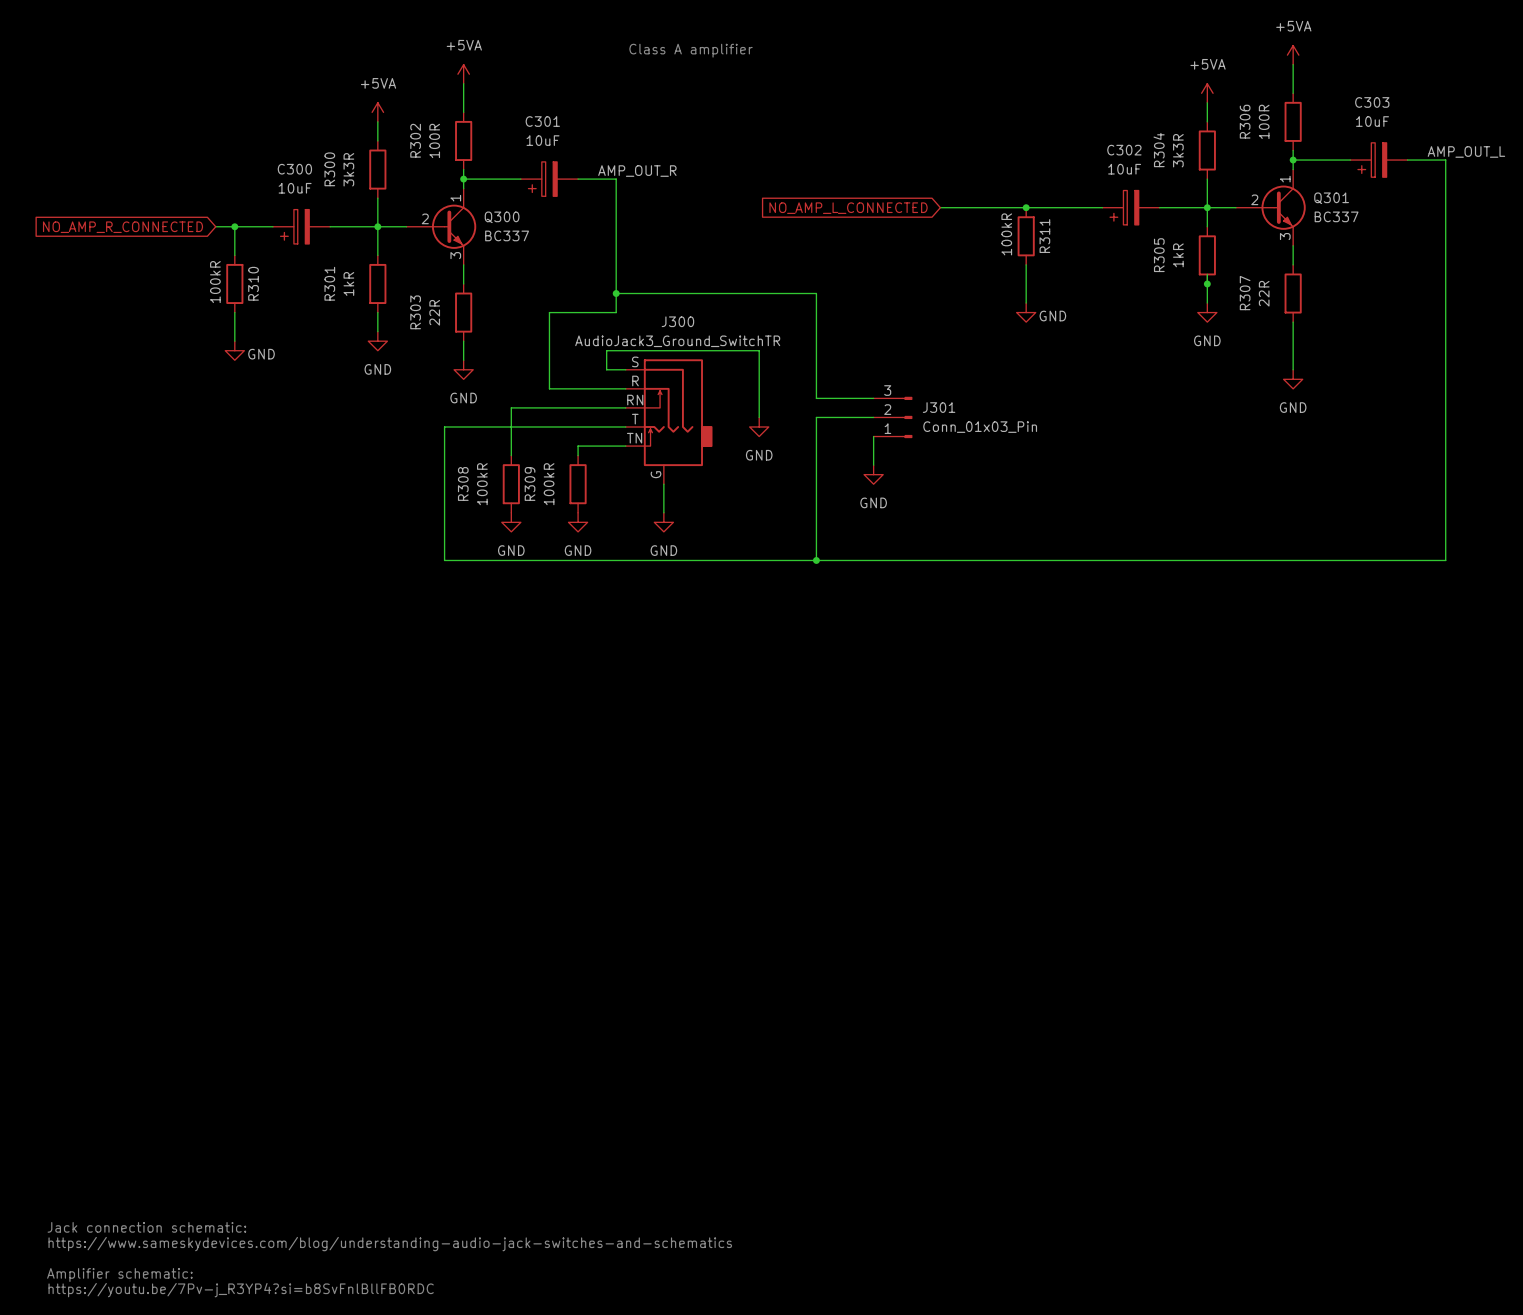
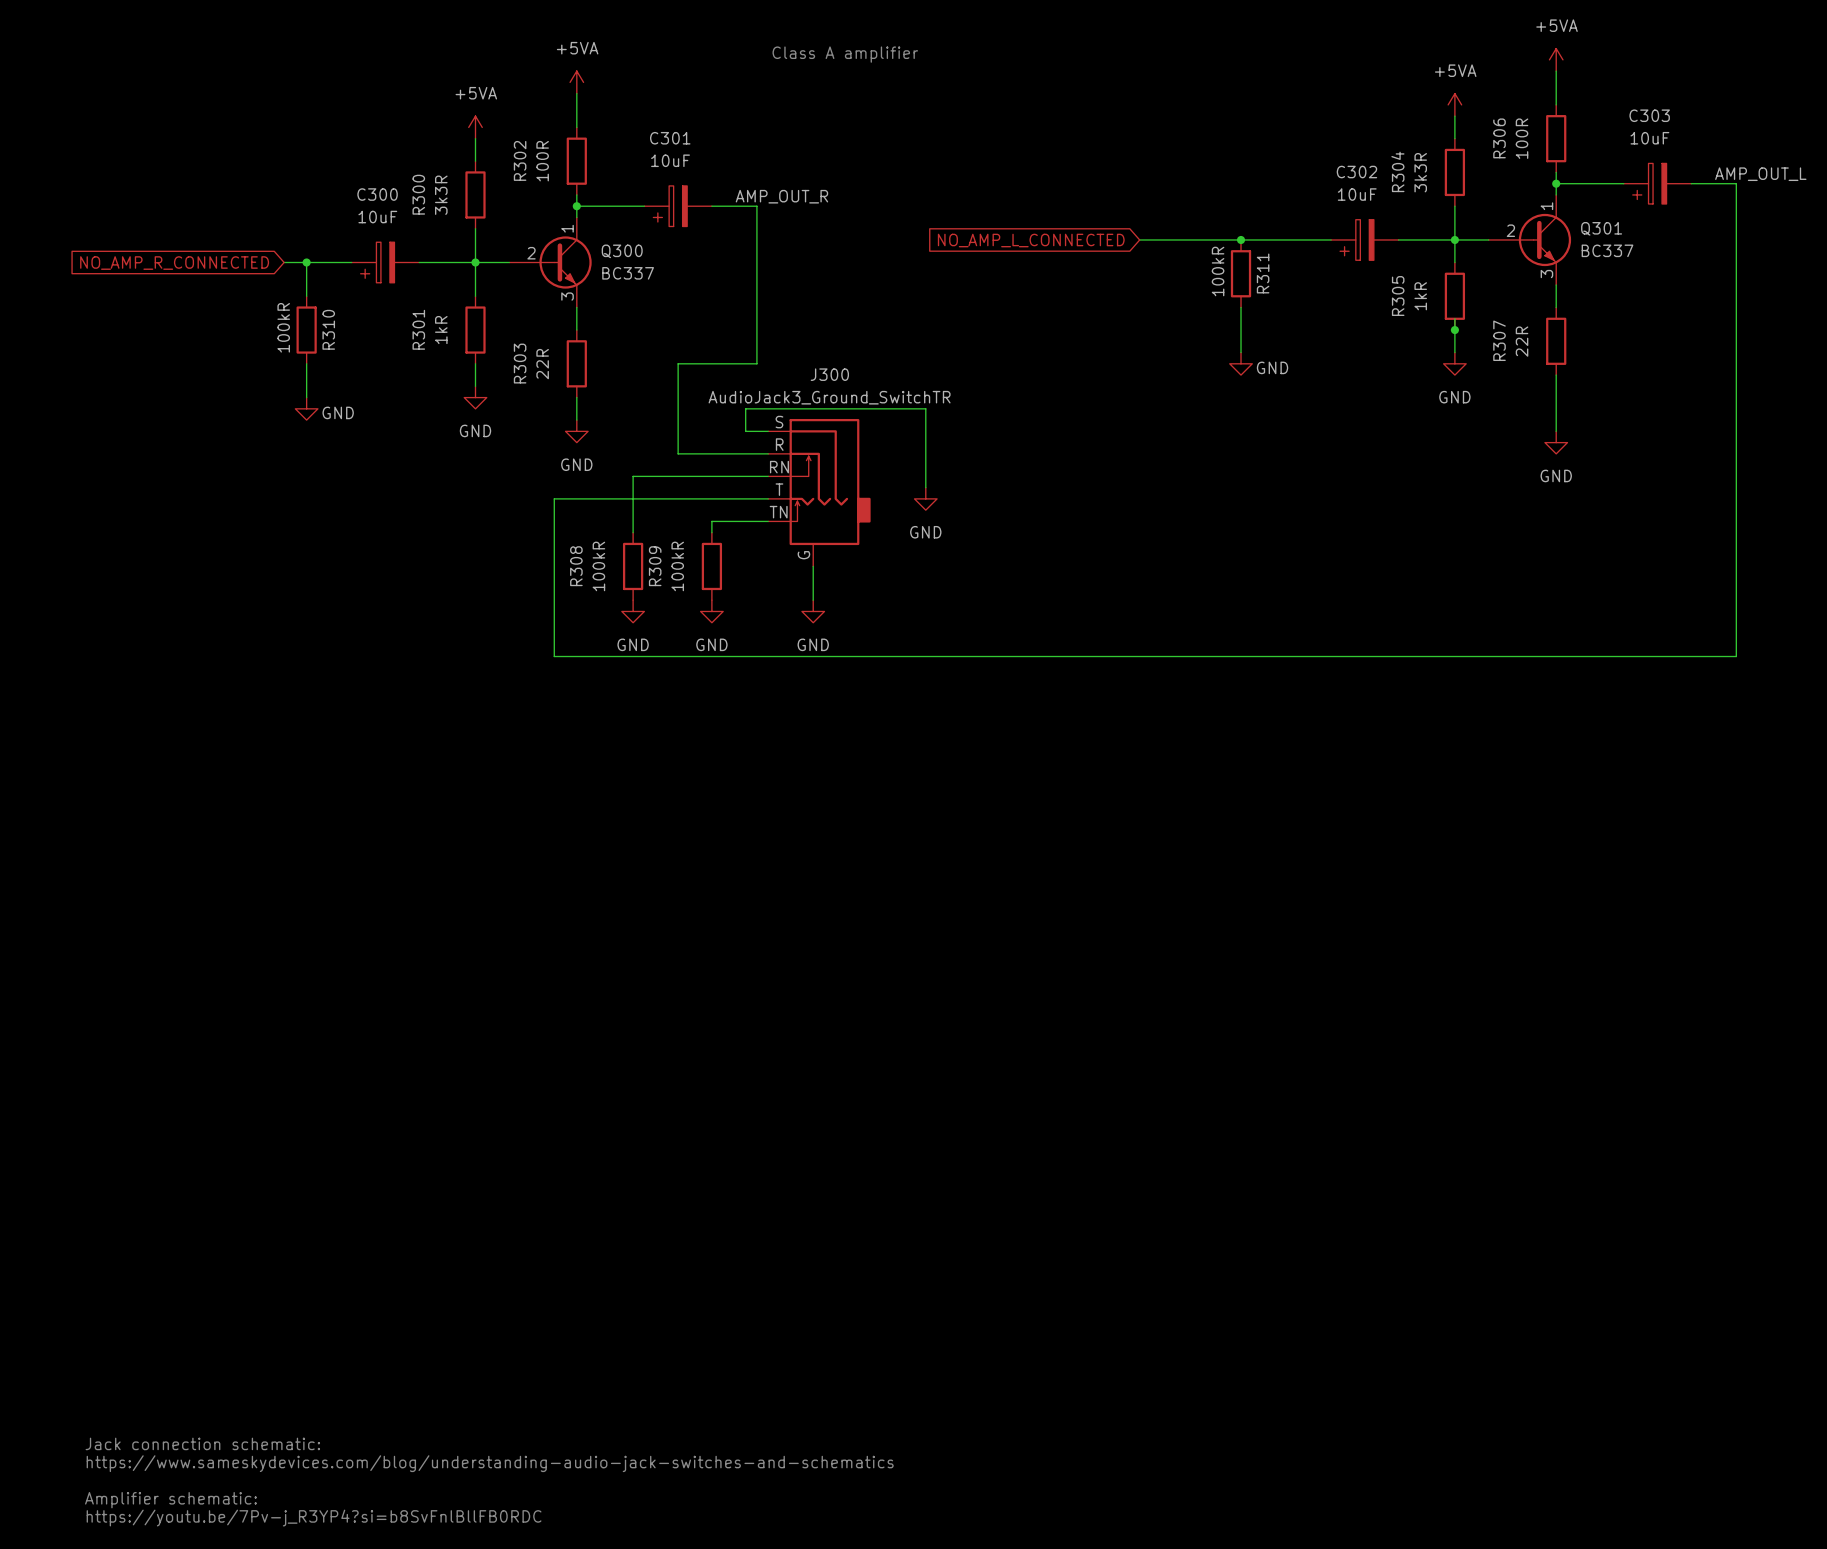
wire: (616, 293) (816, 293) (816, 398) (873, 398) -> none
junction: (616, 293) -> none
wire: (873, 417) (816, 417) (816, 560) -> none
J301: Conn_01x03_Pin (892, 417) -> none
wire: (873, 436) (873, 465) -> none
power symbol: GND (873, 474) -> none
junction: (816, 560) -> none

